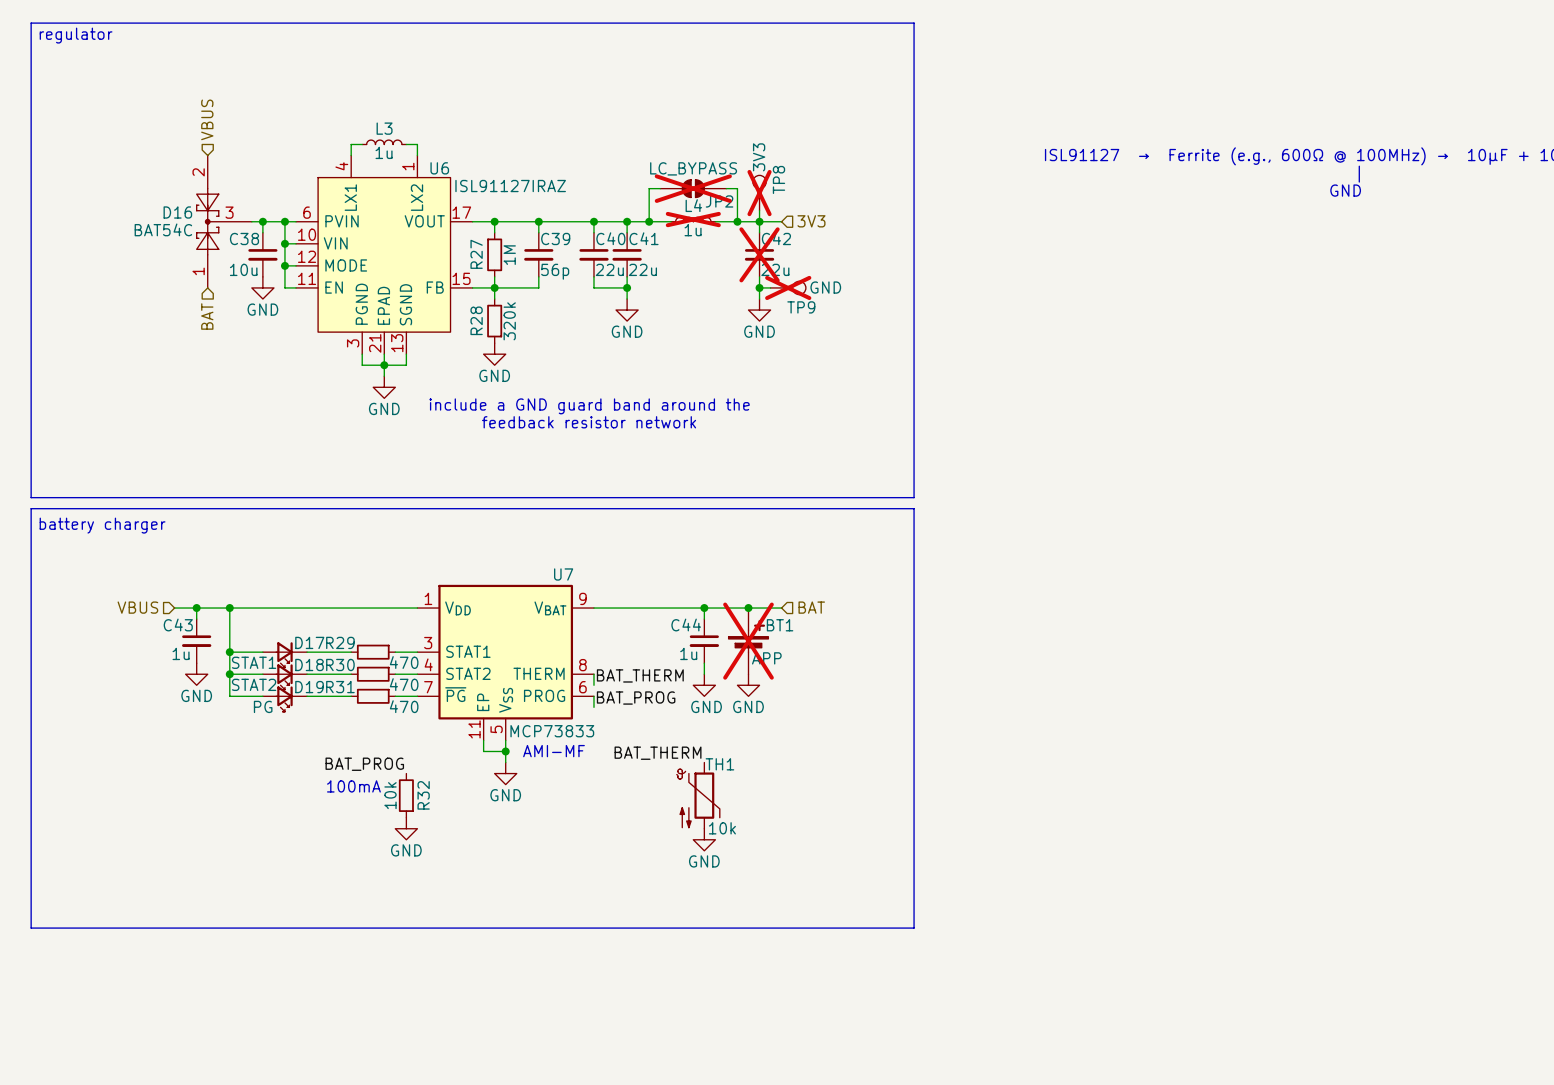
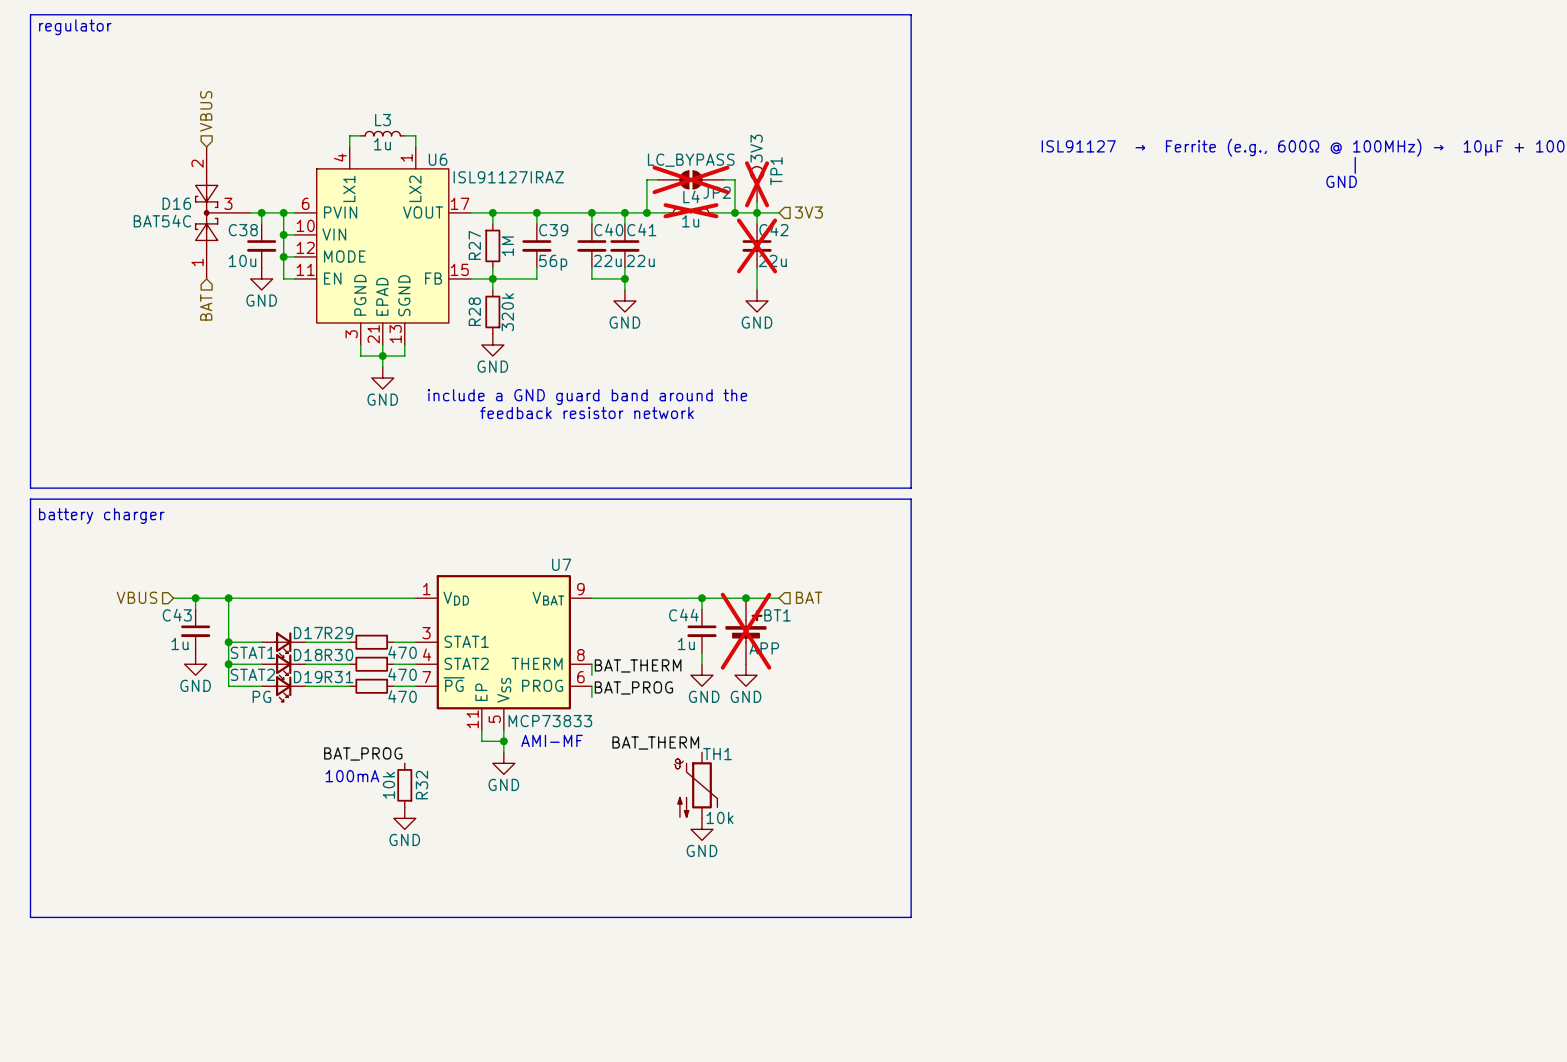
TP8 name: TP8 (778, 179) -> TP1 (776, 171)
wire: (759, 287) (770, 287) -> none
junction: (759, 287) -> none
TP9: GND (788, 287) -> none

